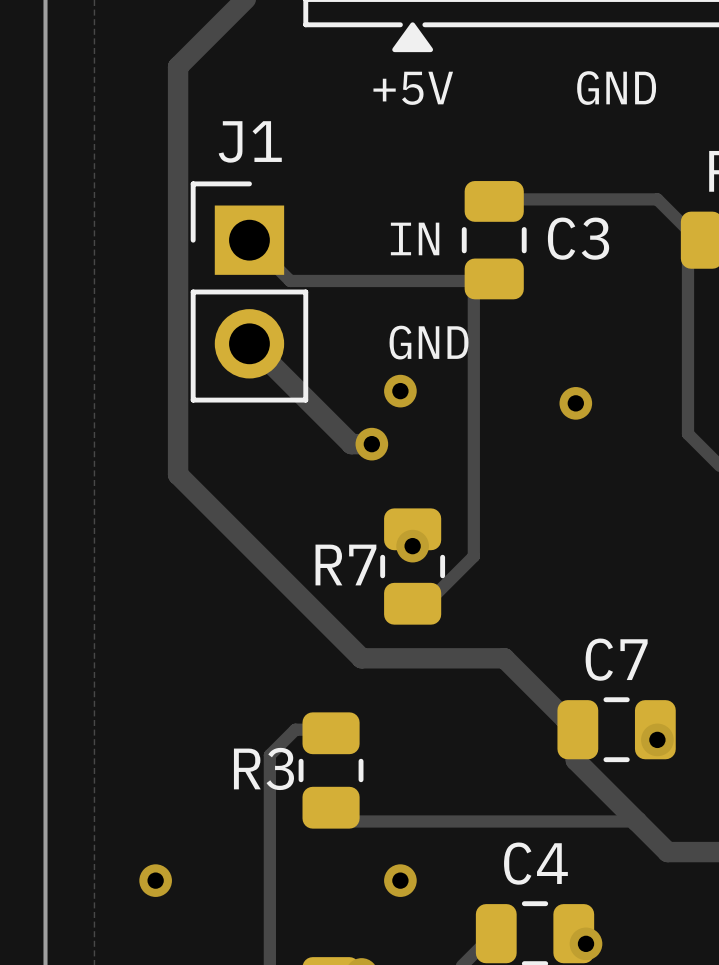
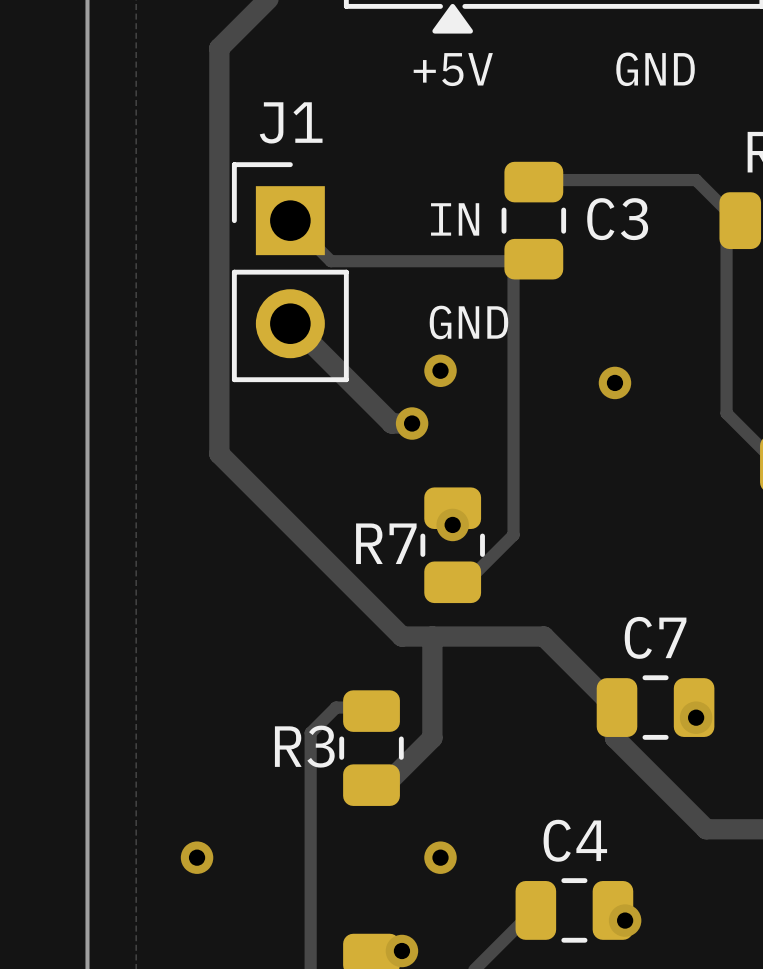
track: (331, 807) (331, 811) (341, 821) (637, 821) -> (371, 785) (378, 785) (381, 788) (432, 737) (432, 636)

